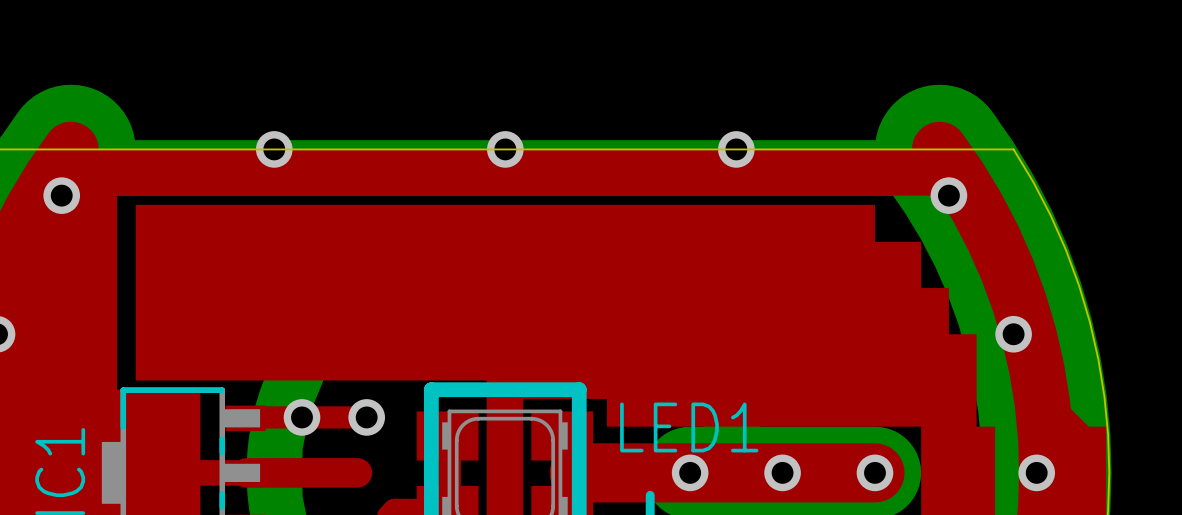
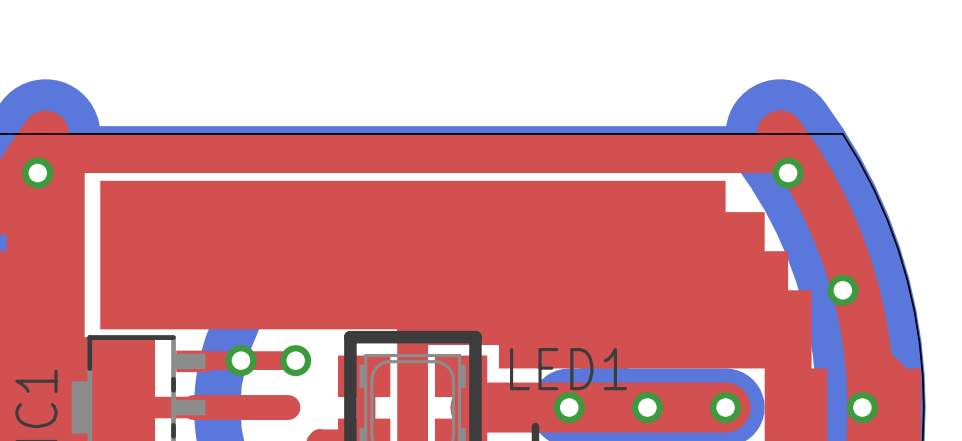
via: (274, 149) -> none
via: (505, 149) -> none
via: (736, 149) -> none

